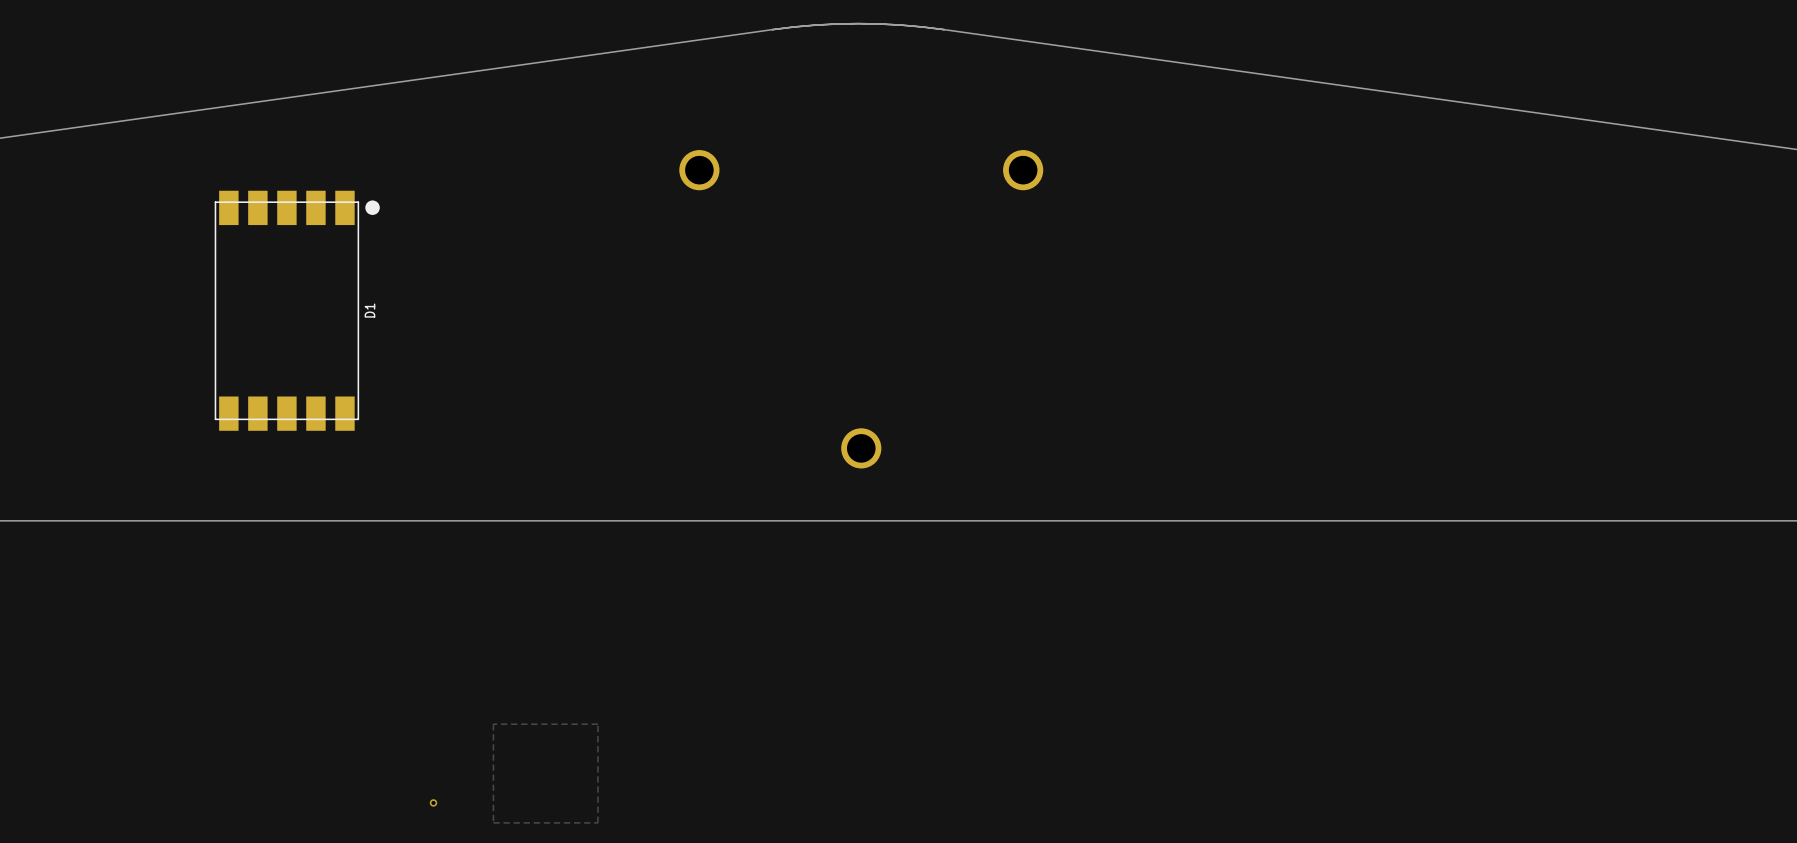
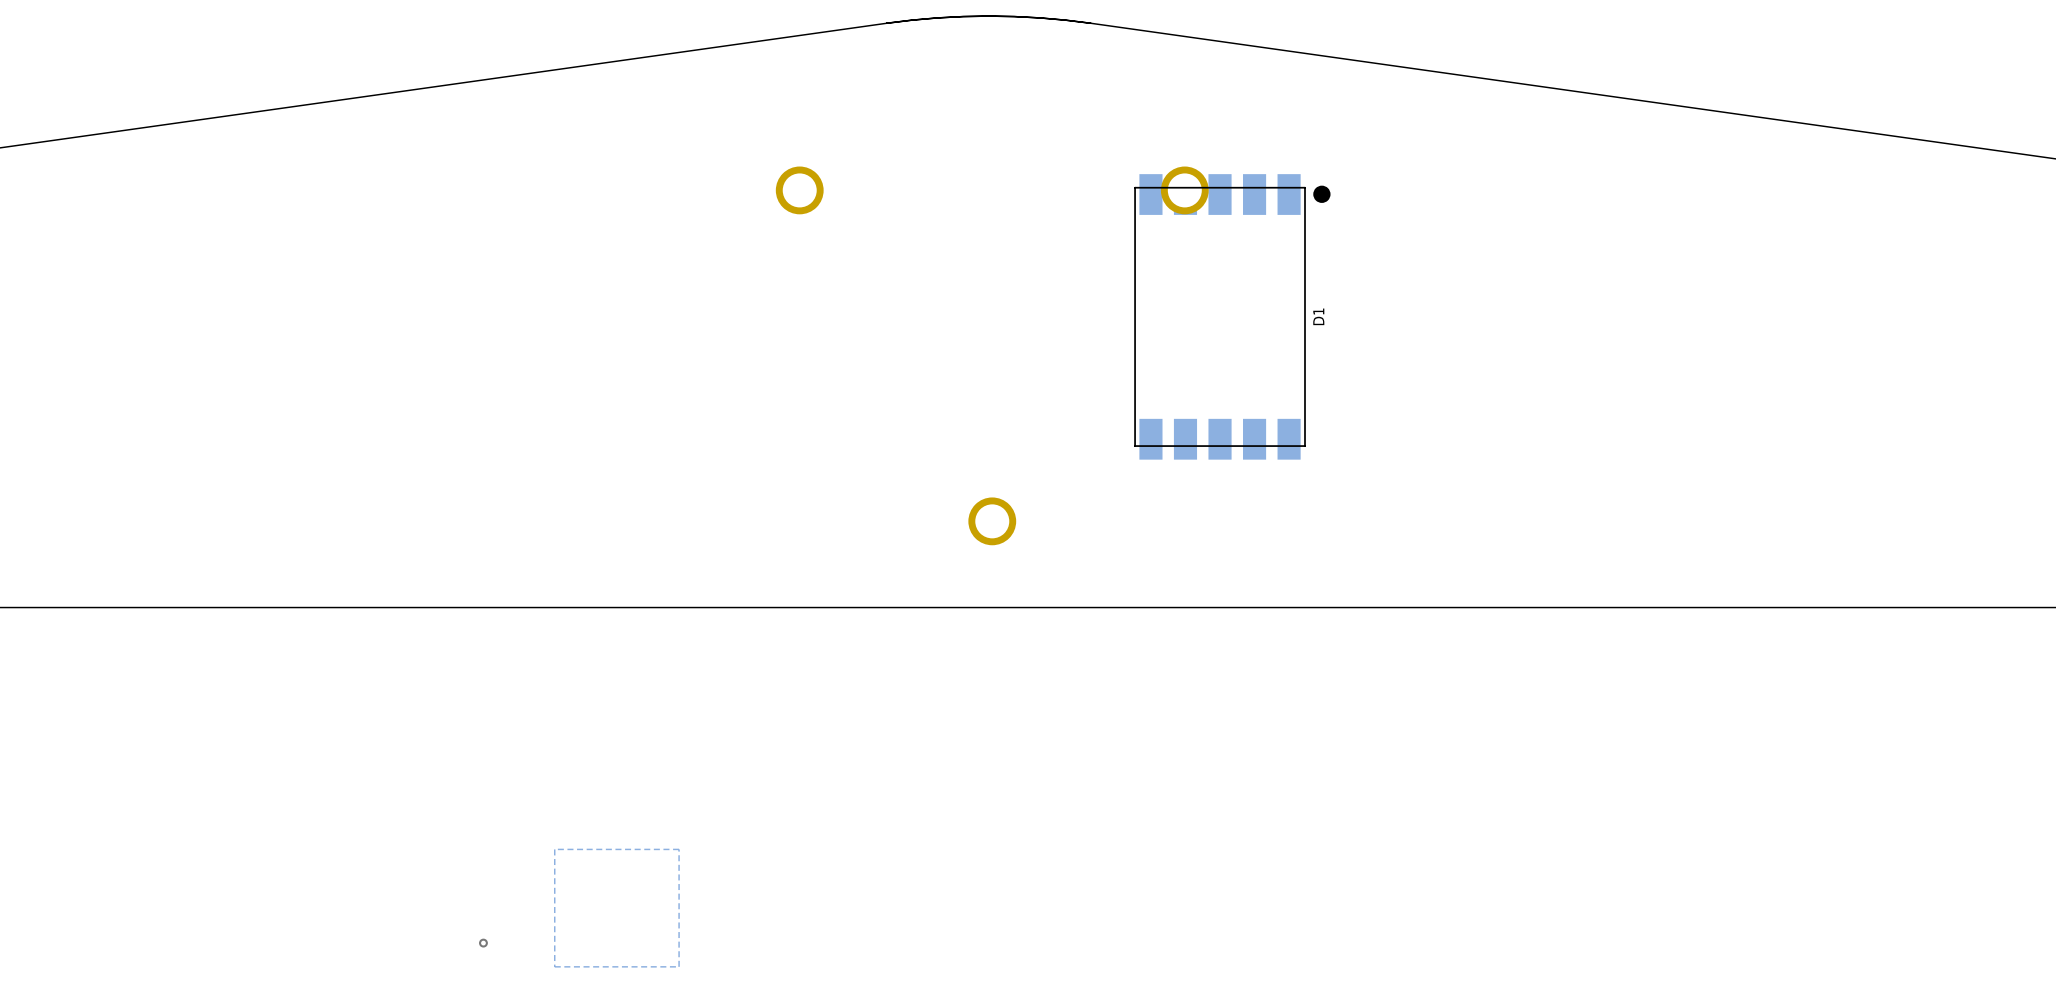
D1 position: (297, 310) -> (1232, 316)

